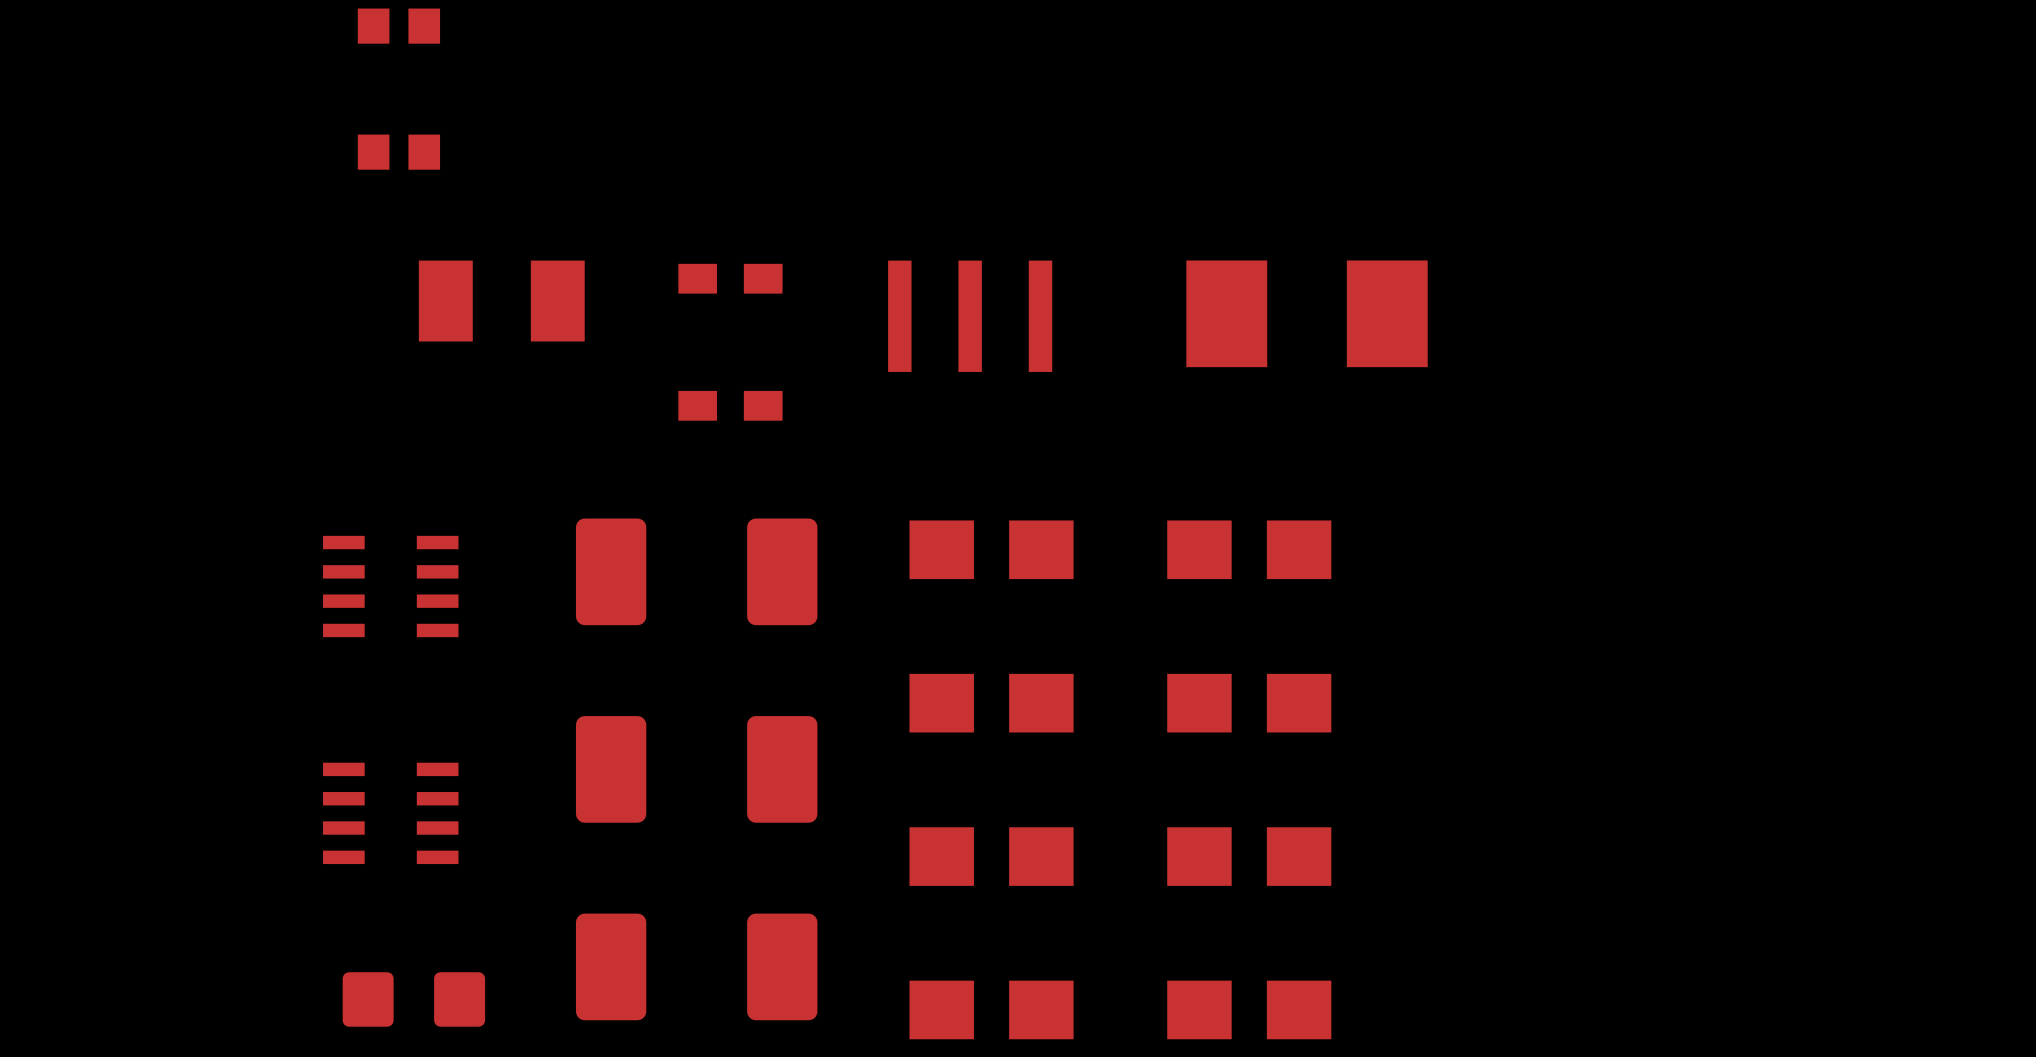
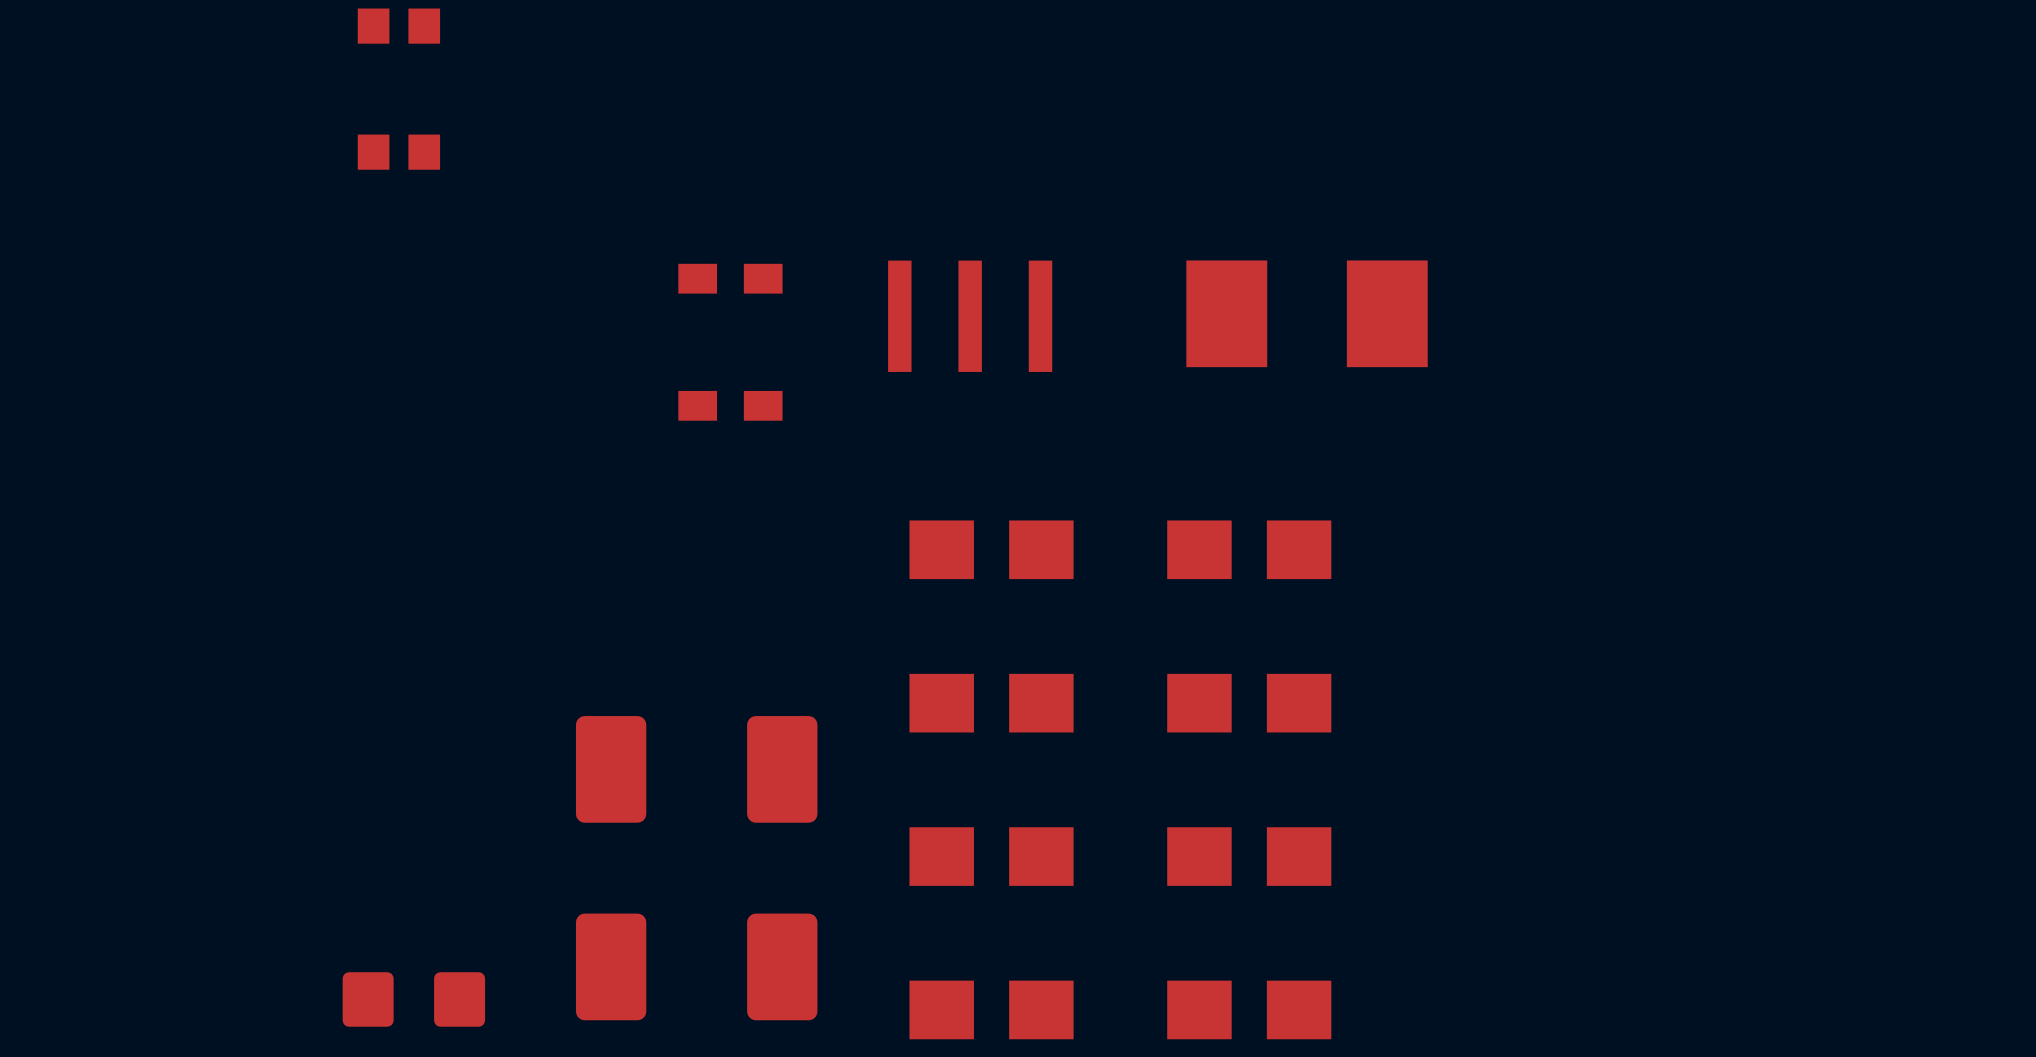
part: (501, 301) -> none
part: (696, 571) -> none
part: (390, 586) -> none
part: (390, 813) -> none

